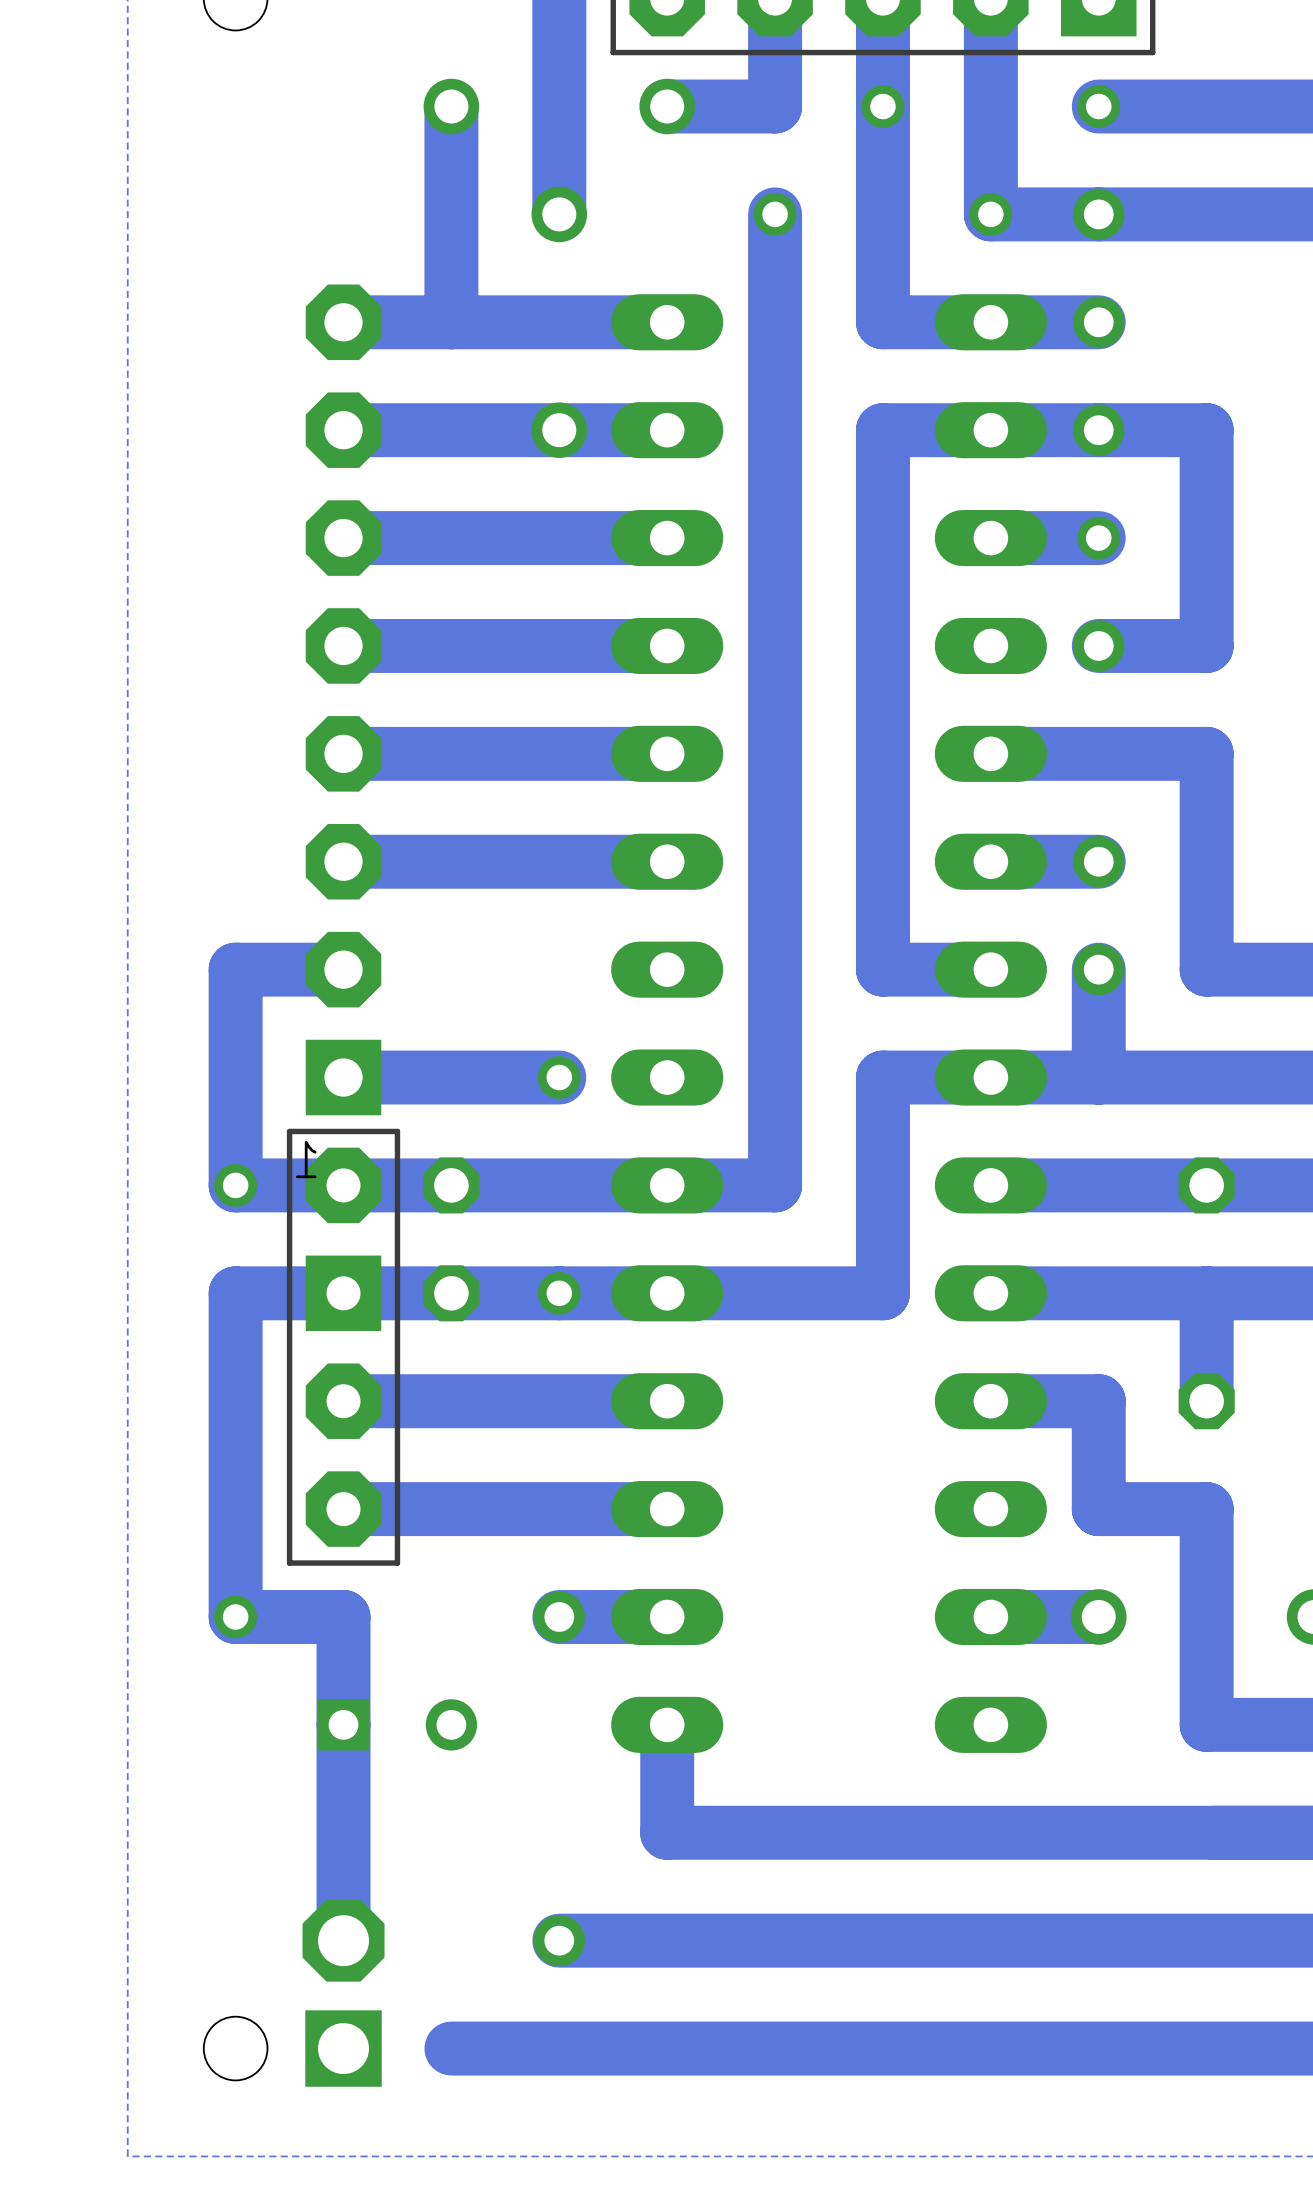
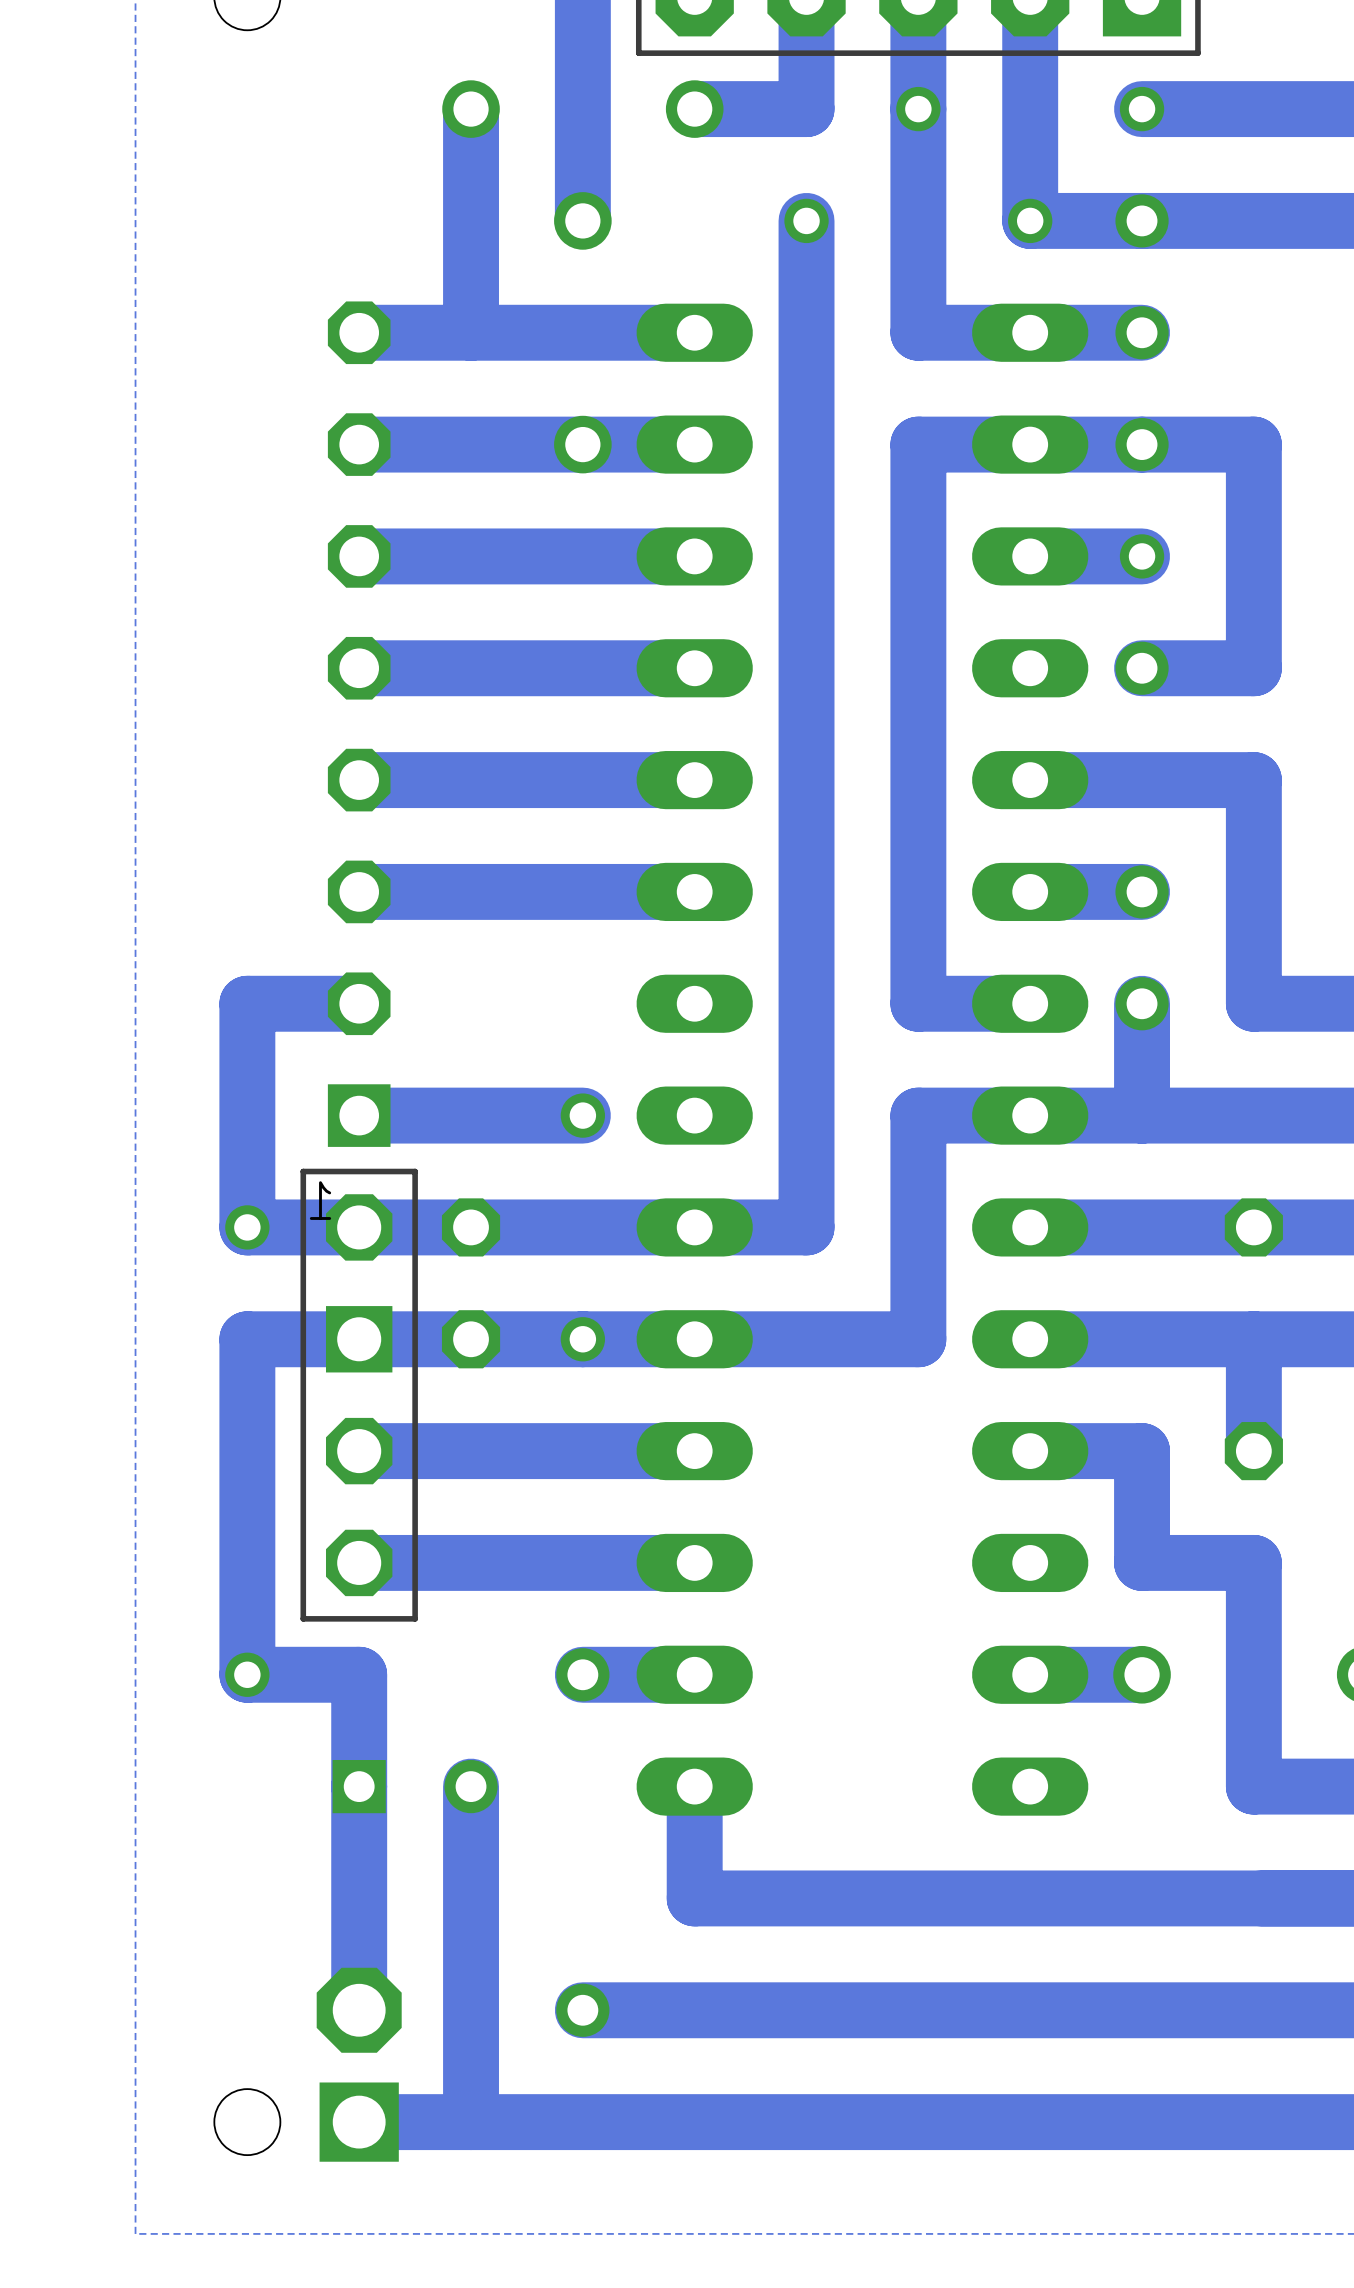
part footprint: [305, 284, 382, 1116] -> [327, 301, 391, 1147]
part footprint: [286, 1128, 401, 1566] -> [300, 1168, 418, 1622]
track: none -> (471, 1786) (471, 2122) (359, 2122)

